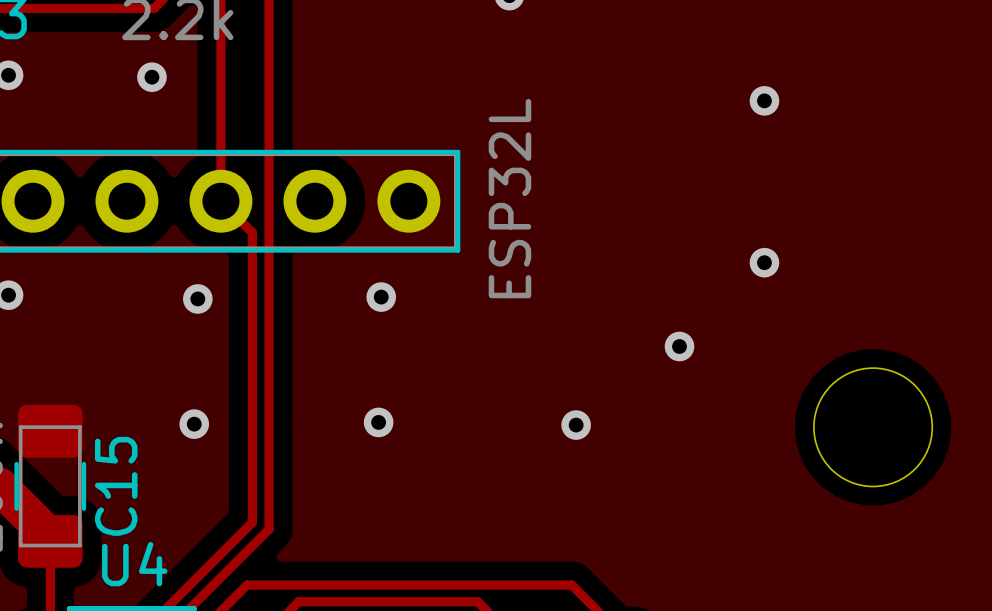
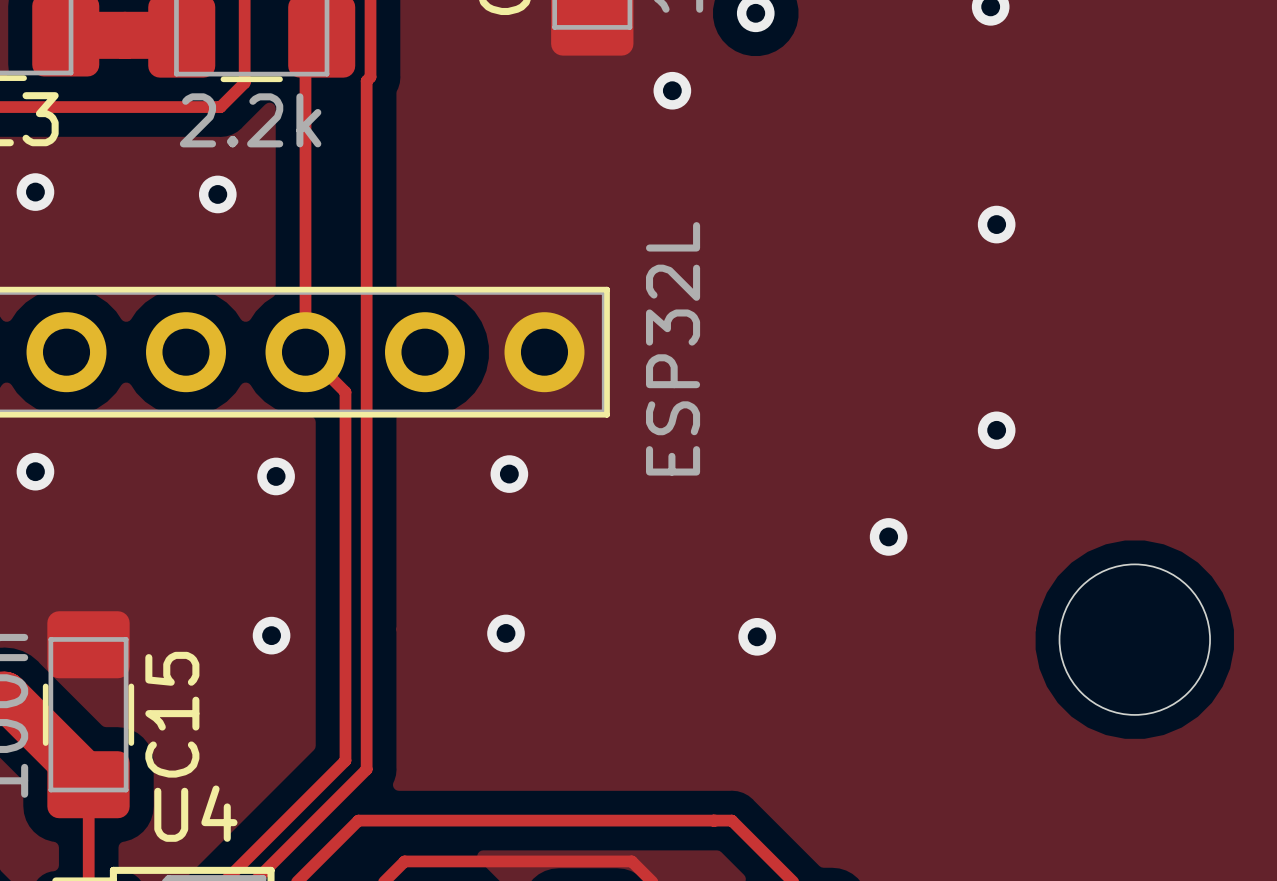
track: (247, 585) (571, 585) -> (338, 840) (358, 820) (731, 820) (751, 840)

